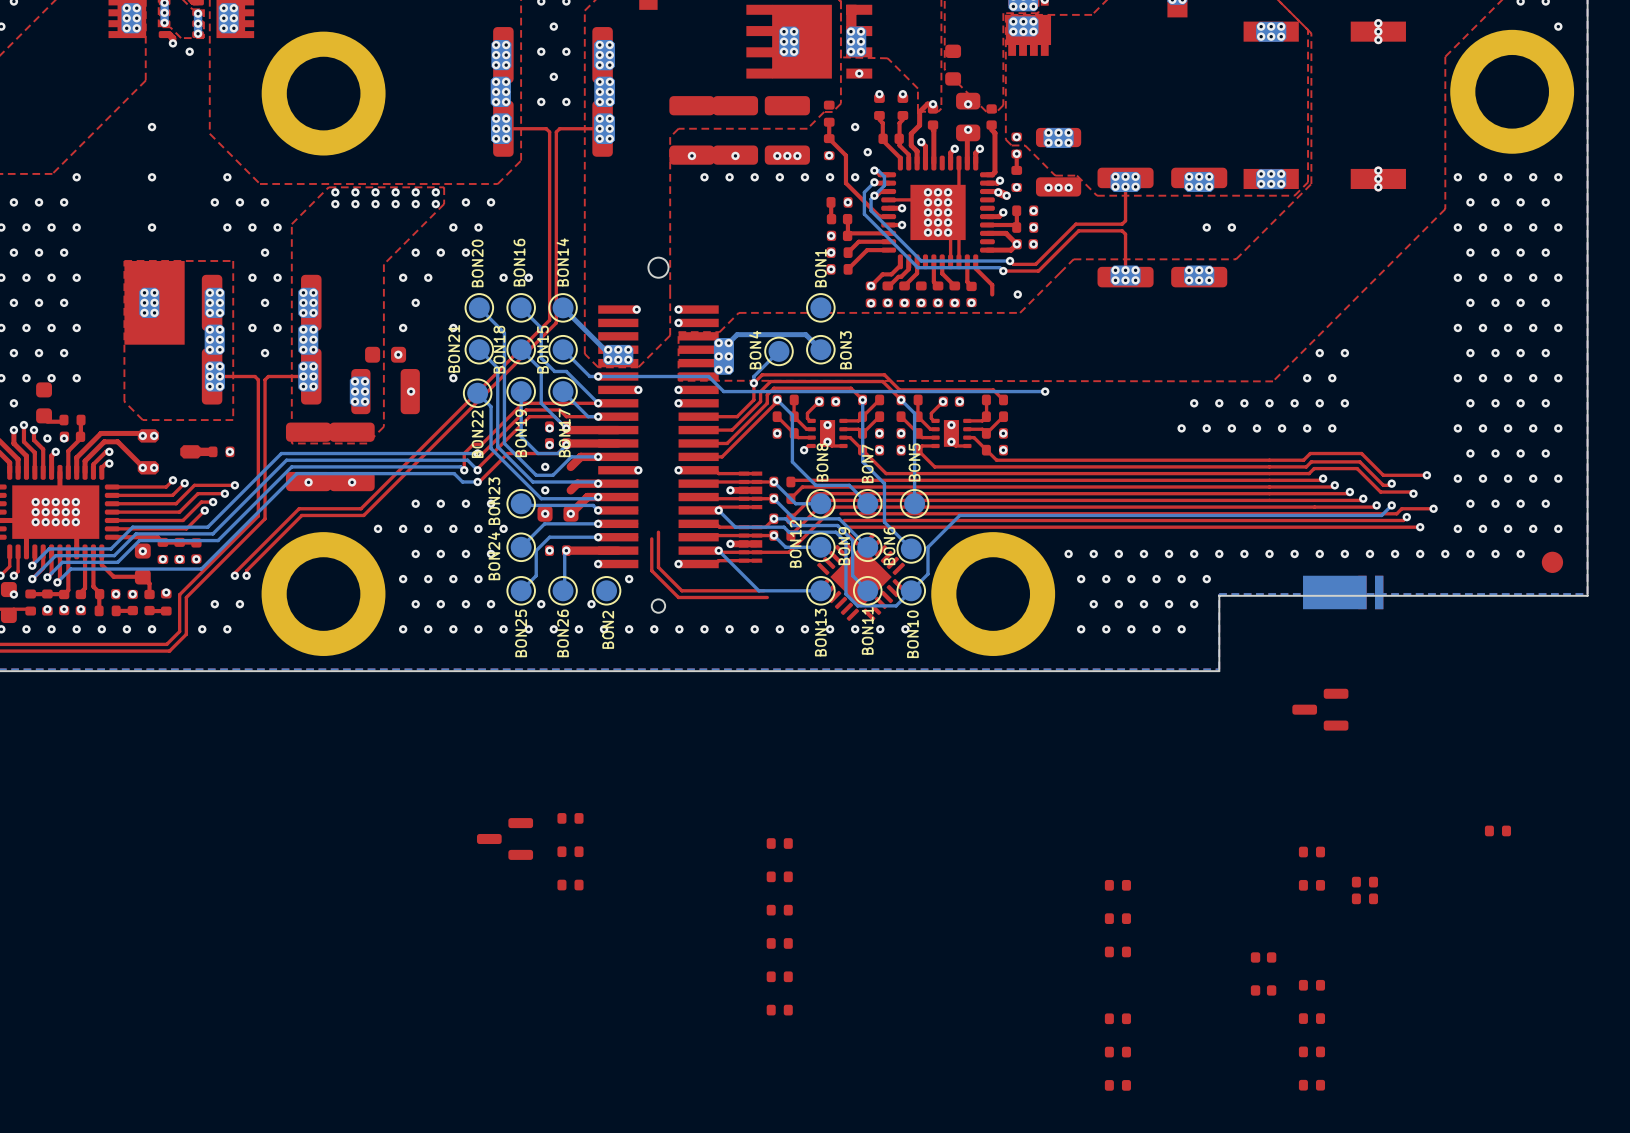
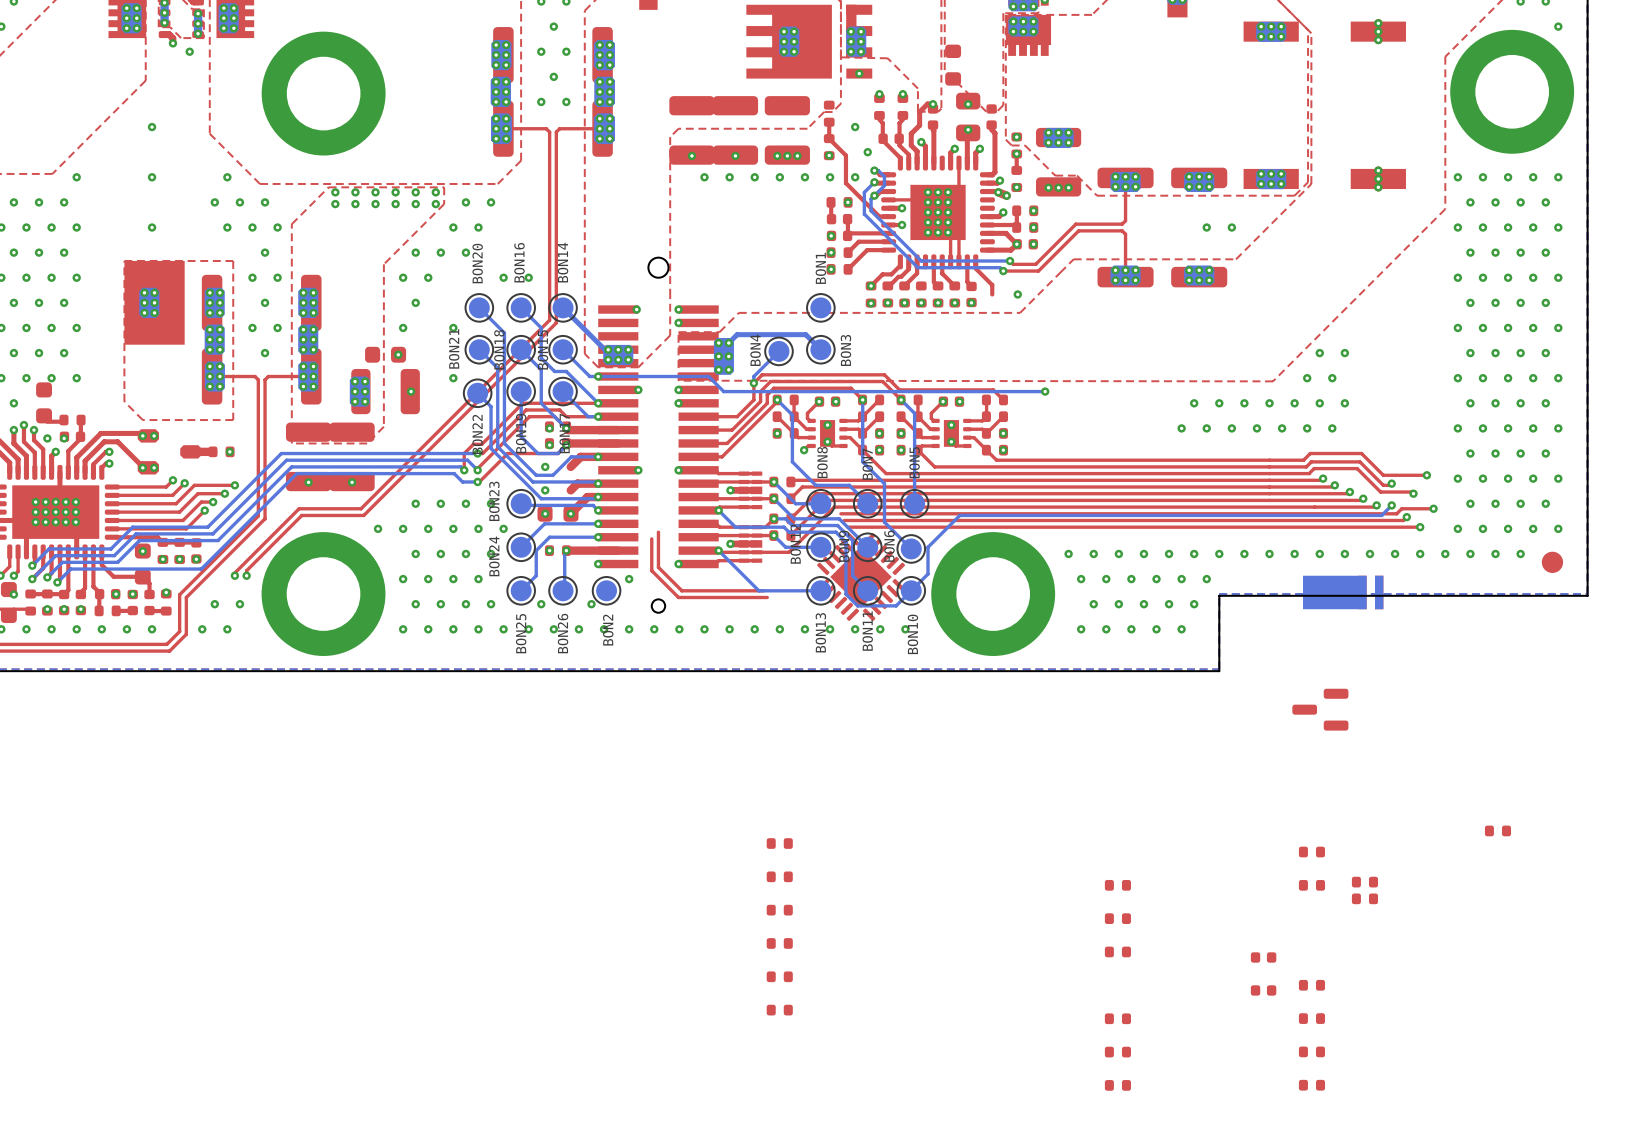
part: (570, 818) -> none
part: (505, 838) -> none
part: (570, 851) -> none
part: (570, 885) -> none

